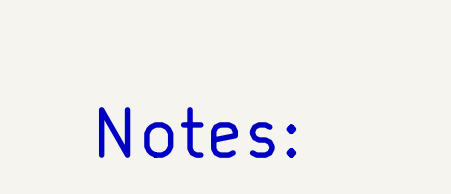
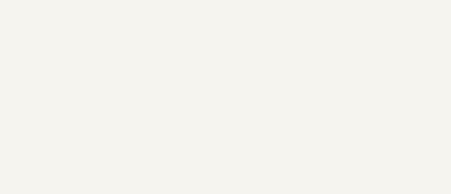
text: Notes: (197, 132) -> none

